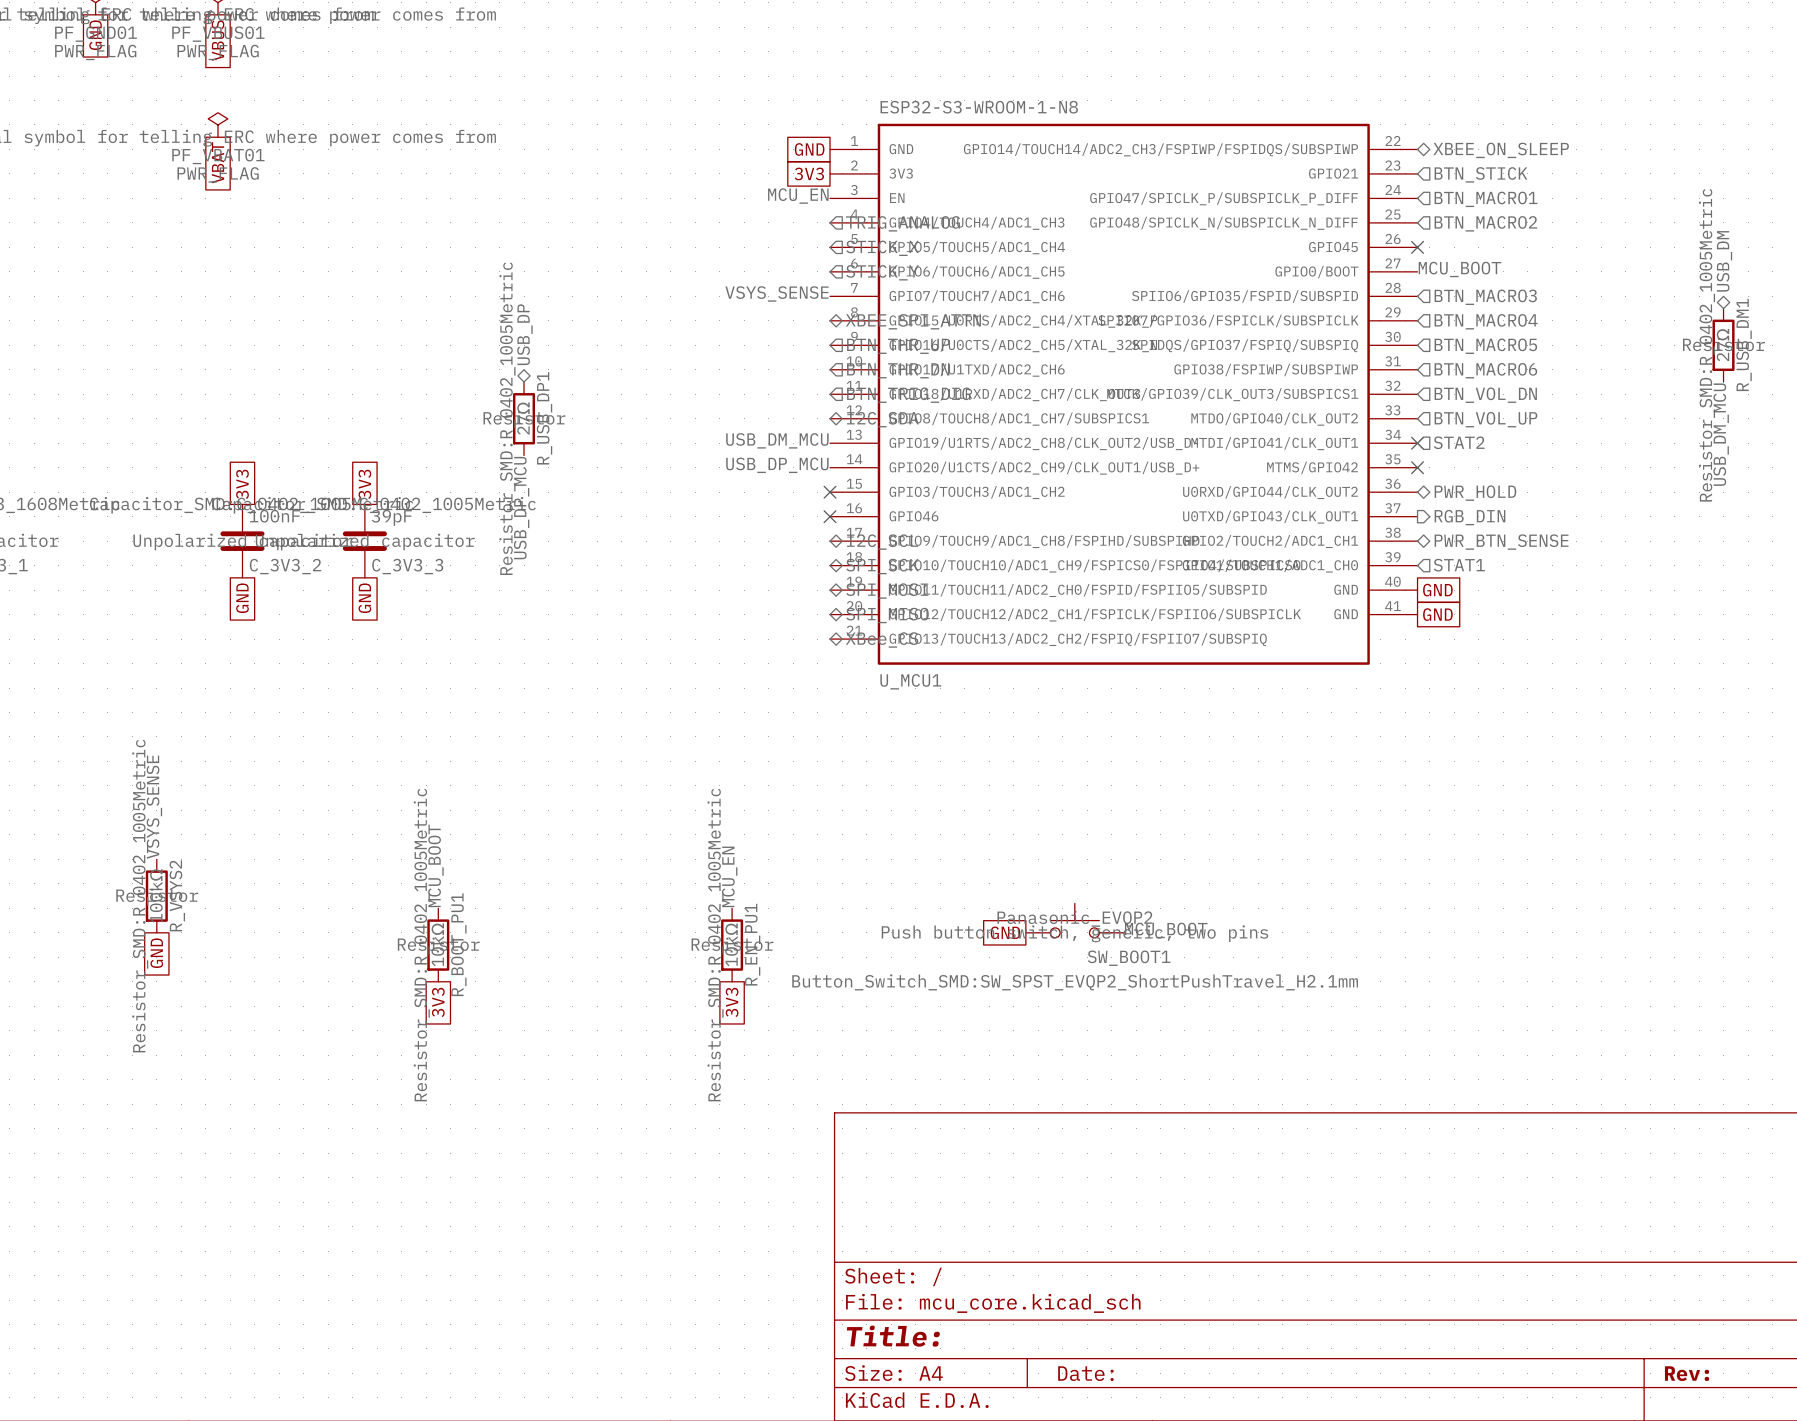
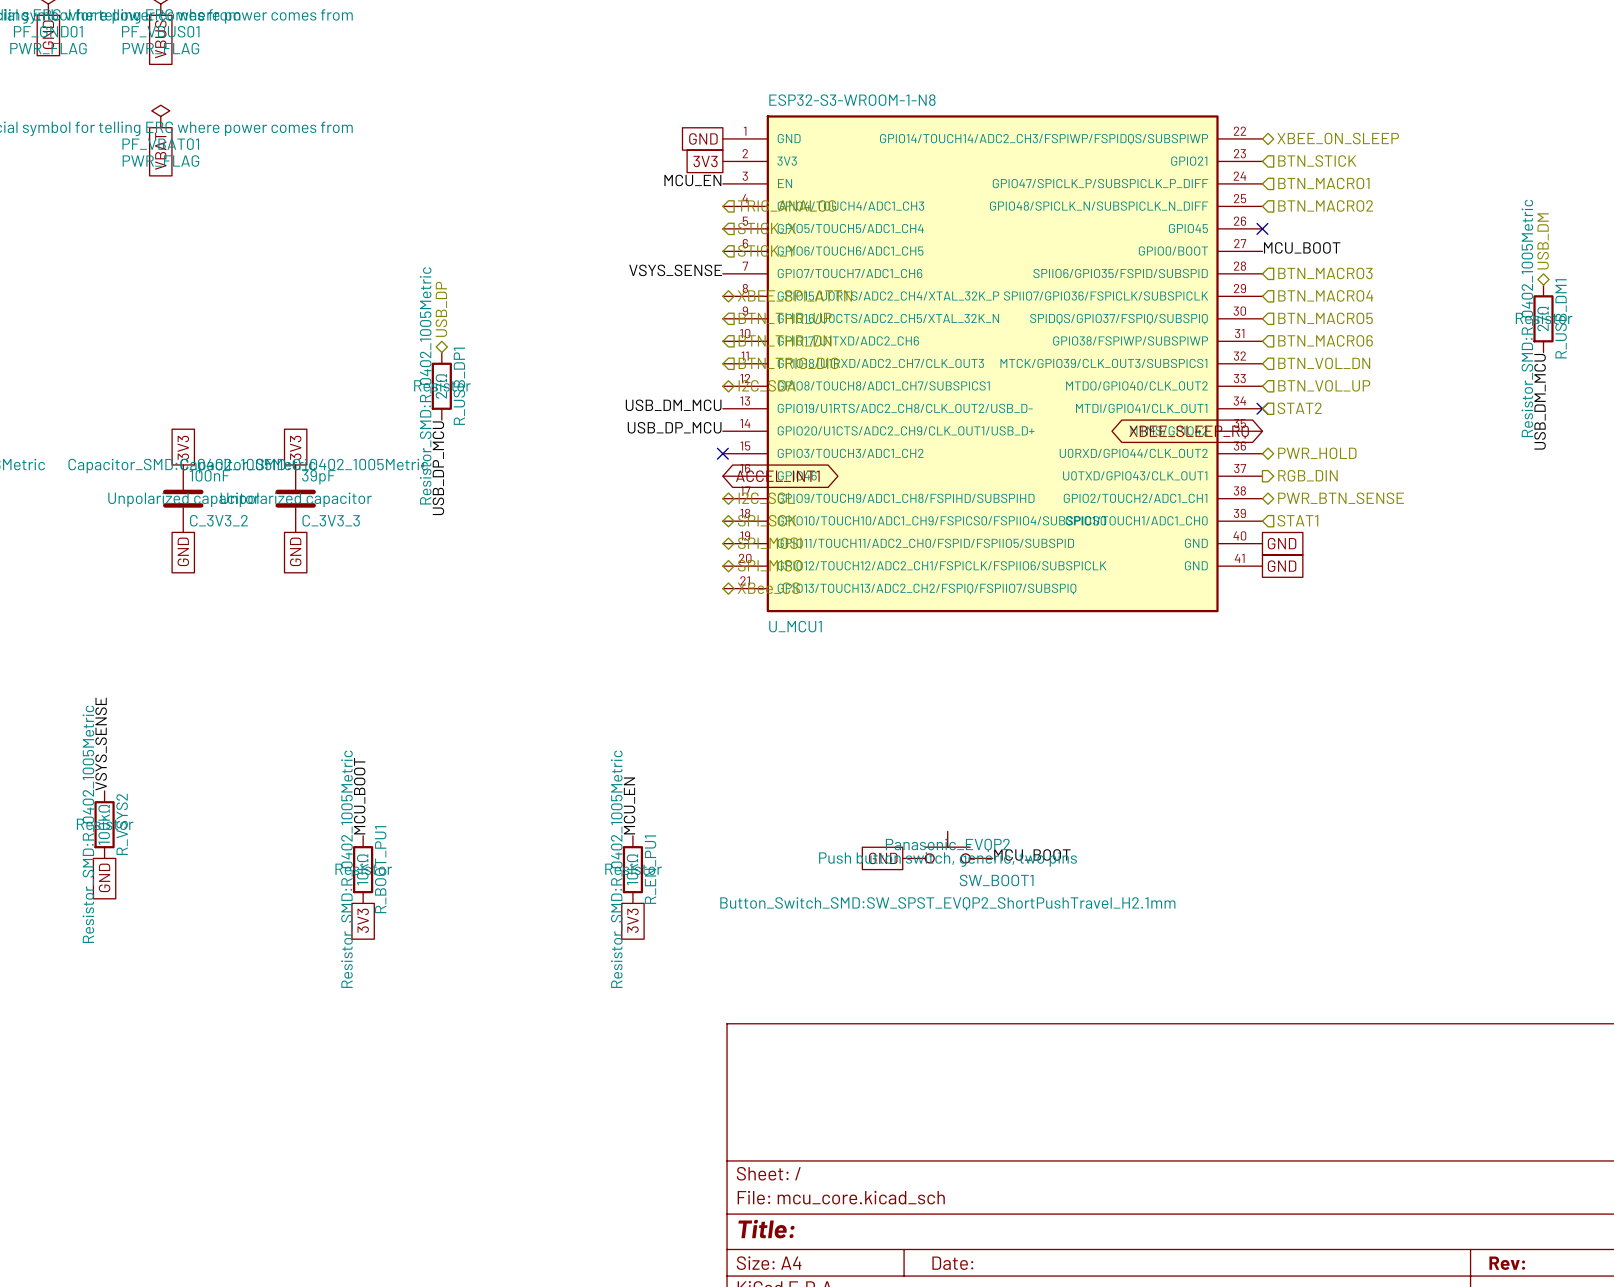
no-connect mark: (1417, 467) -> none
global label: none -> XBEE_SLEEP_RQ (1189, 432)
no-connect mark: (830, 516) -> none
global label: none -> ACCEL_INT1 (777, 476)

